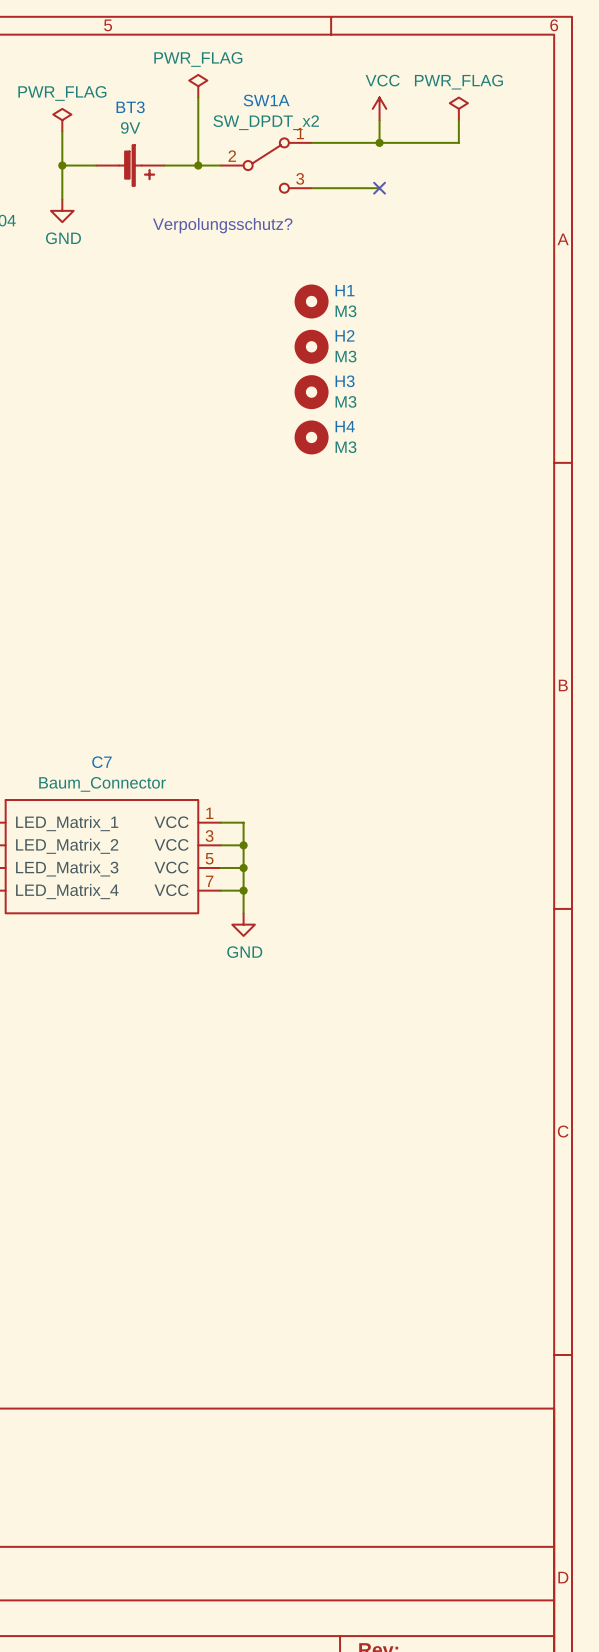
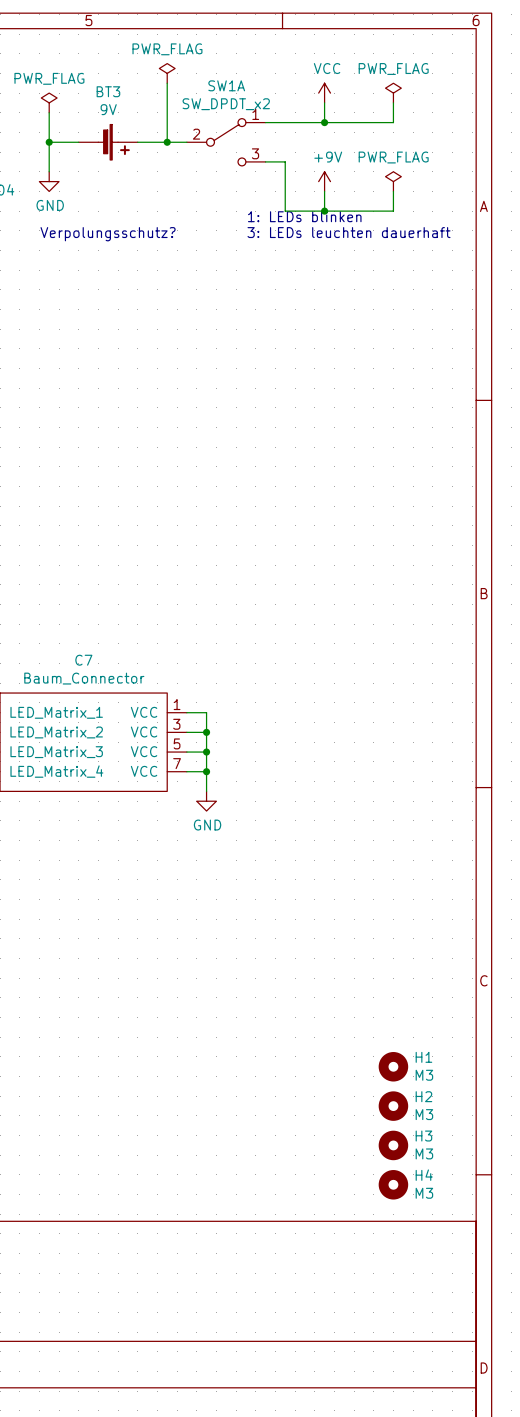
wire: (334, 188) (379, 188) -> (285, 161) (285, 211) (393, 211) (393, 191)
no-connect mark: (379, 188) -> none
power symbol: none -> +9V (324, 181)
power symbol: none -> PWR_FLAG (393, 181)
wire: none -> (324, 191) (324, 211)
text position: Verpolungsschutz? (222, 225) -> Verpolungsschutz? (108, 234)
junction: none -> (324, 211)
text: none -> 1: LEDs blinken (304, 216)
text: none -> 3: LEDs leuchten dauerhaft (349, 232)
H1 position: (311, 301) -> (393, 1066)
H2 position: (311, 346) -> (393, 1106)
H3 position: (311, 392) -> (393, 1145)
H4 position: (311, 437) -> (393, 1184)

